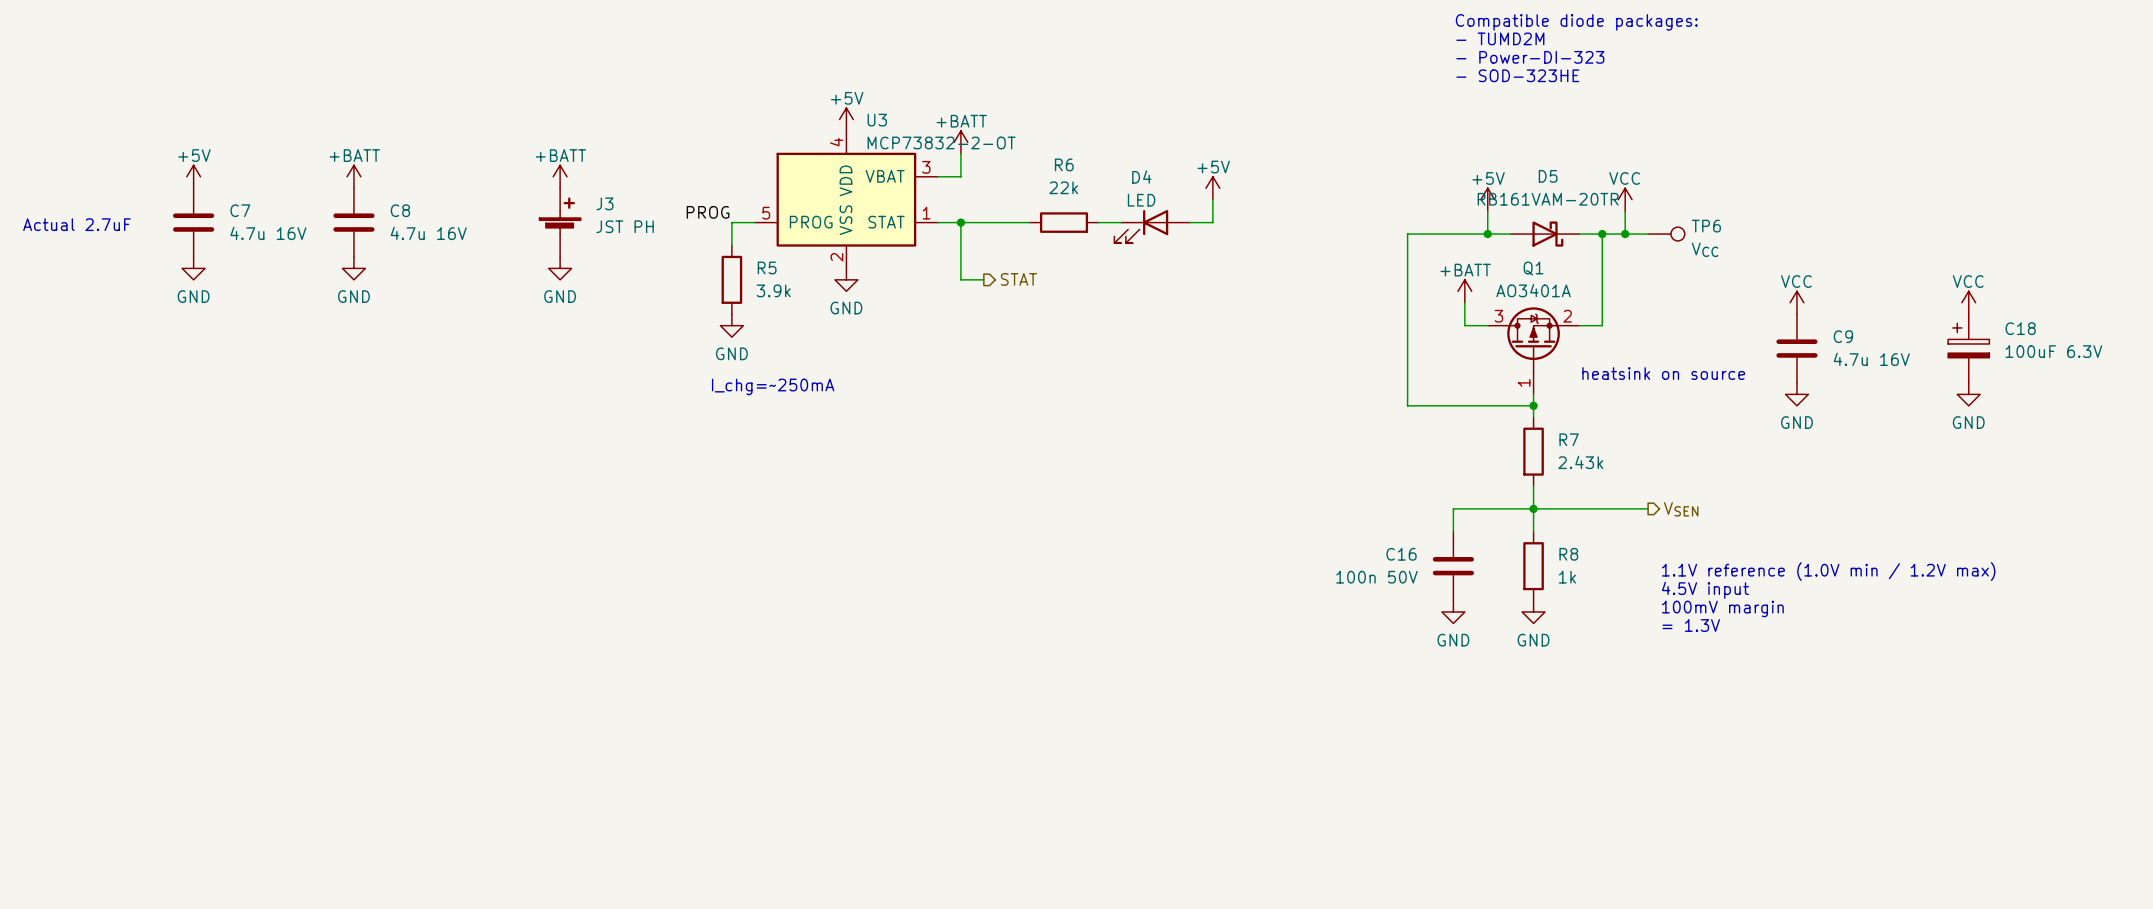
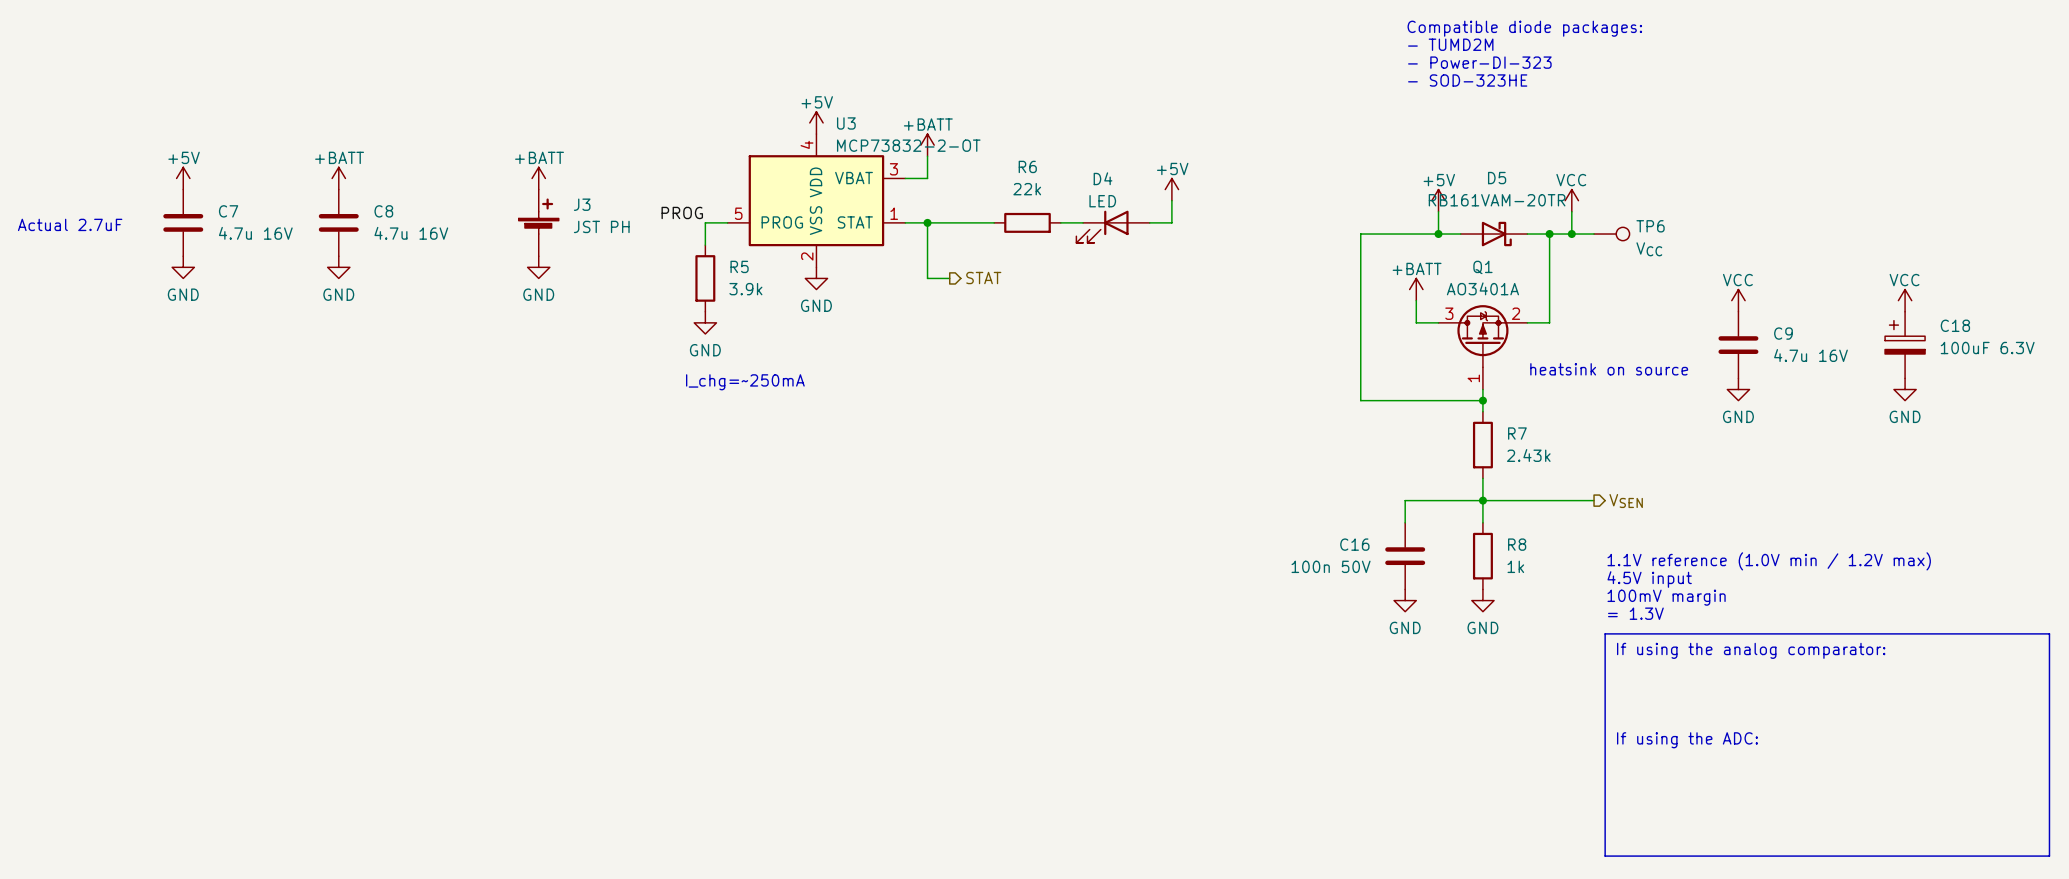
line: none -> (1605, 633) (2049, 633) (2049, 856) (1605, 856) (1605, 633)
text: none -> If using the analog comparator: (1751, 650)
text: none -> If using the ADC: (1687, 740)

